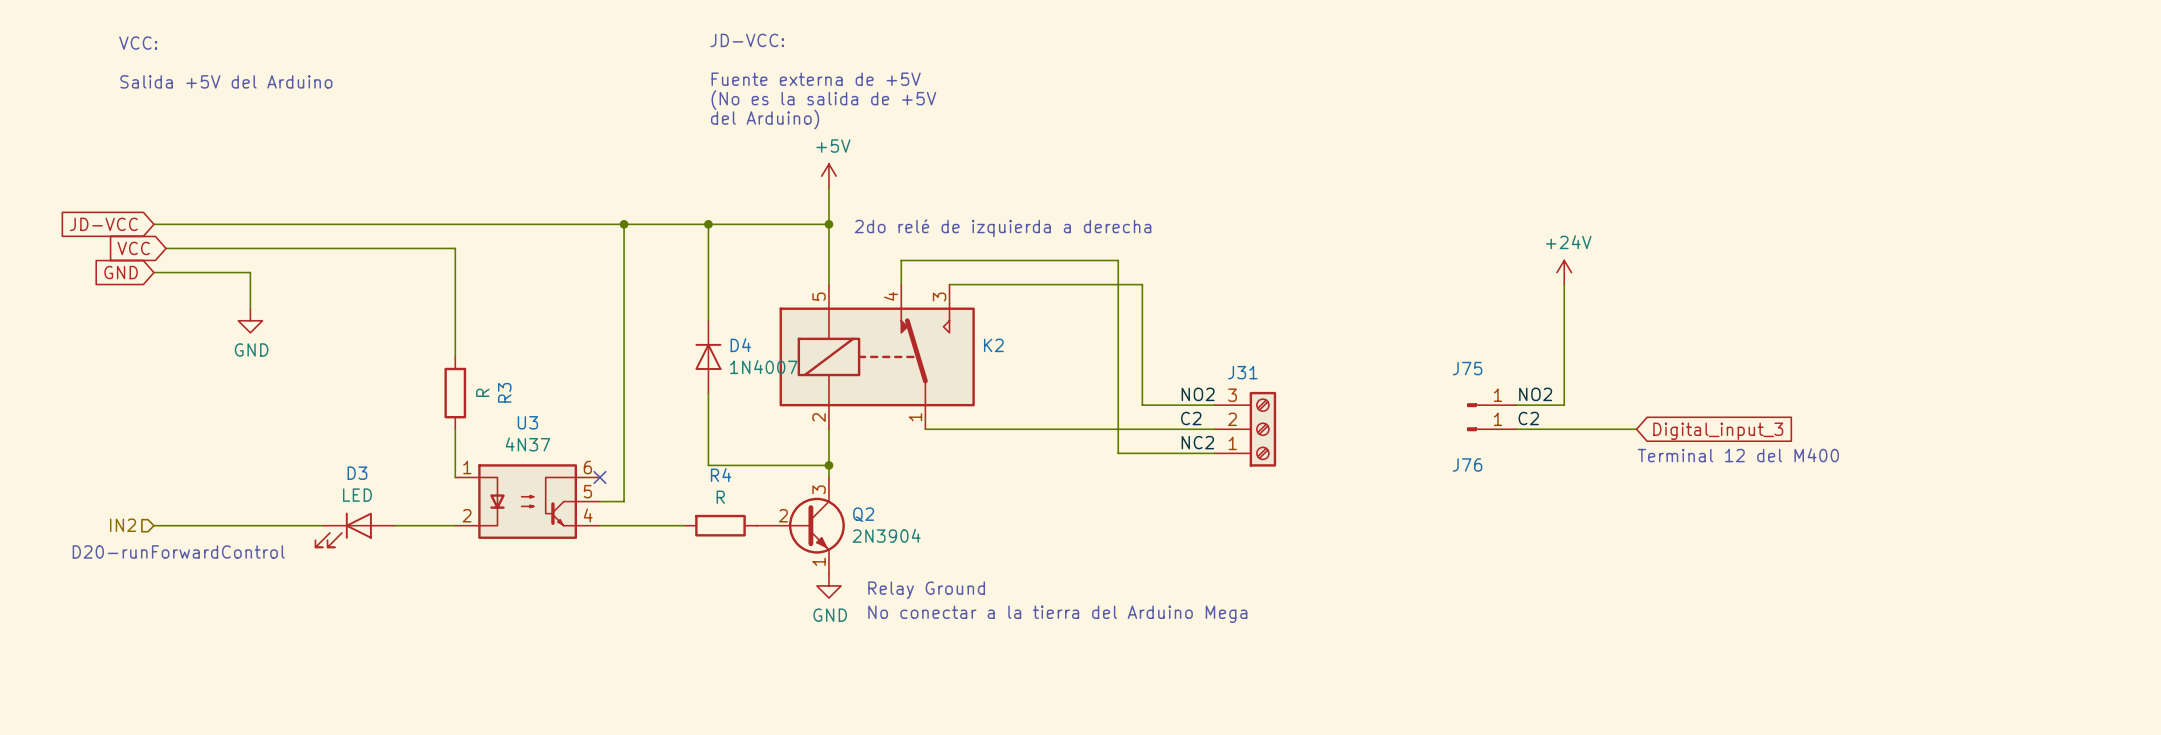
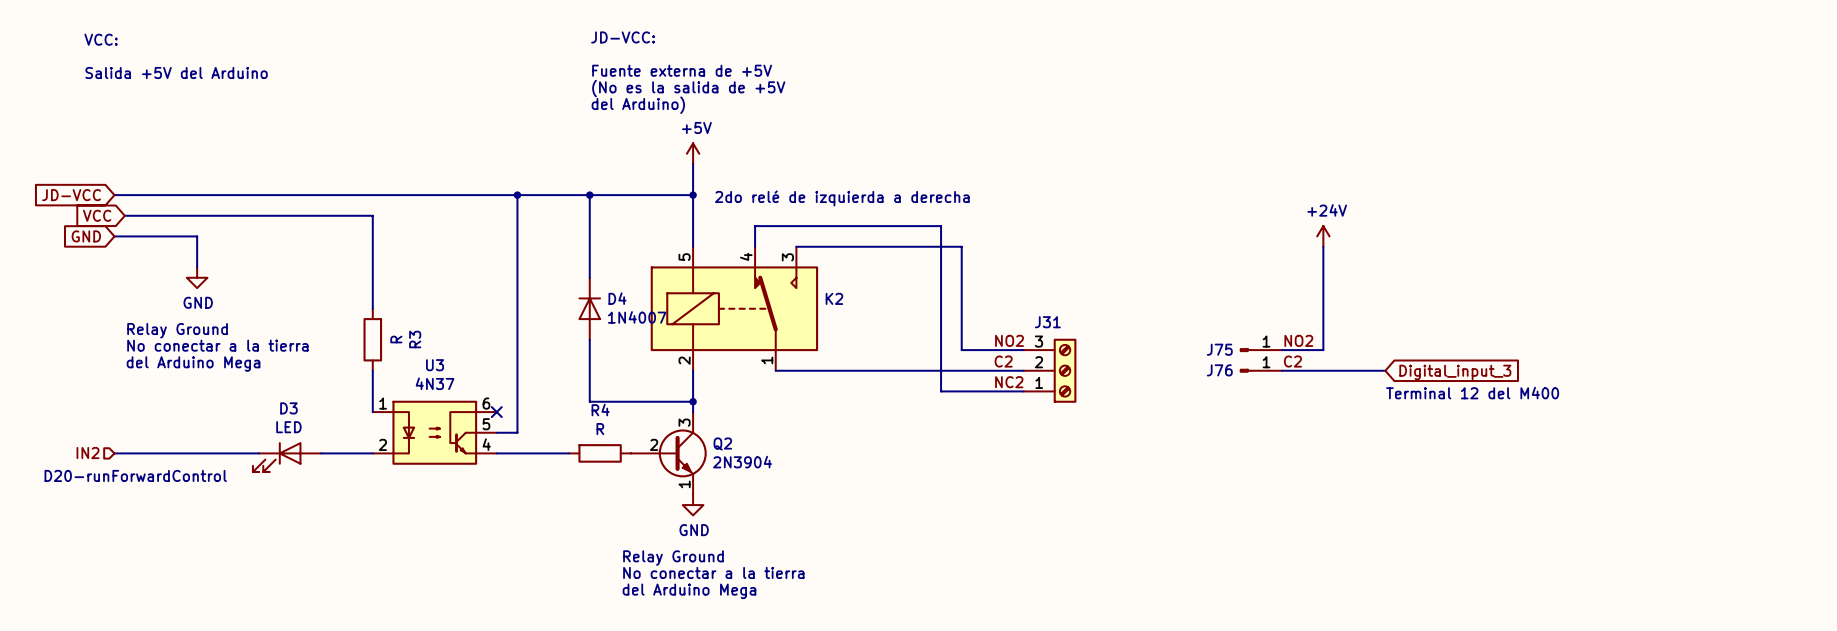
J75 name position: J75 (1467, 368) -> J75 (1219, 349)
text: none -> Relay Ground (177, 330)
text: none -> No conectar a la tierra (217, 345)
text: none -> del Arduino Mega (193, 364)
J76 name position: J76 (1467, 464) -> J76 (1219, 370)
text position: Relay Ground (926, 590) -> Relay Ground (673, 558)
text: No conectar a la tierra del Arduino Mega (1057, 614) -> none
text: none -> No conectar a la tierra (713, 572)
text: none -> del Arduino Mega (689, 591)

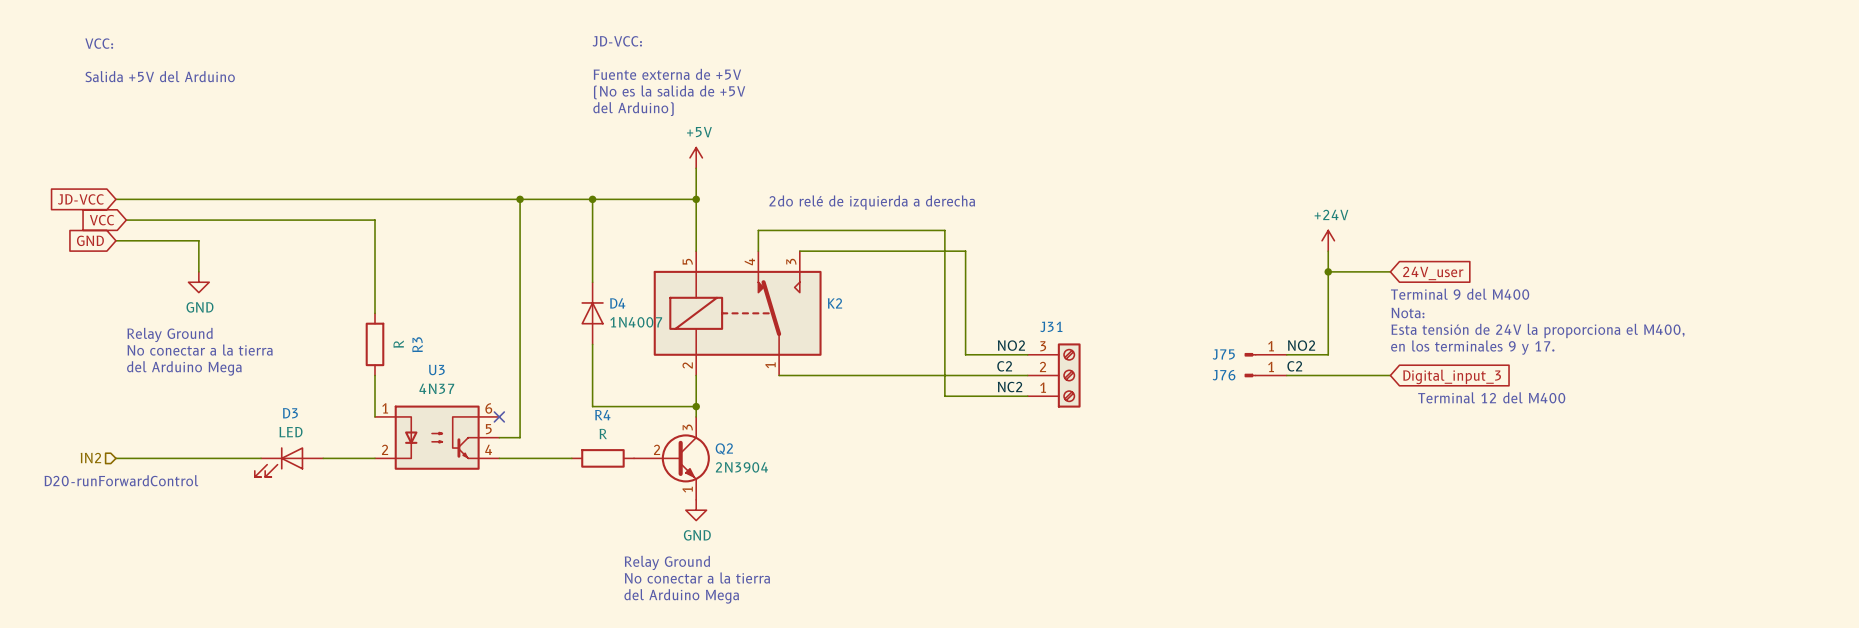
wire: none -> (1328, 271) (1390, 271)
junction: none -> (1328, 271)
global label: none -> 24V_user (1433, 273)
text: none -> Terminal 9 del M400 (1460, 294)
text: none -> Nota: (1408, 312)
text: none -> Esta tensión de 24V la proporciona el M400, (1538, 330)
text: none -> en los terminales 9 y 17. (1472, 347)

